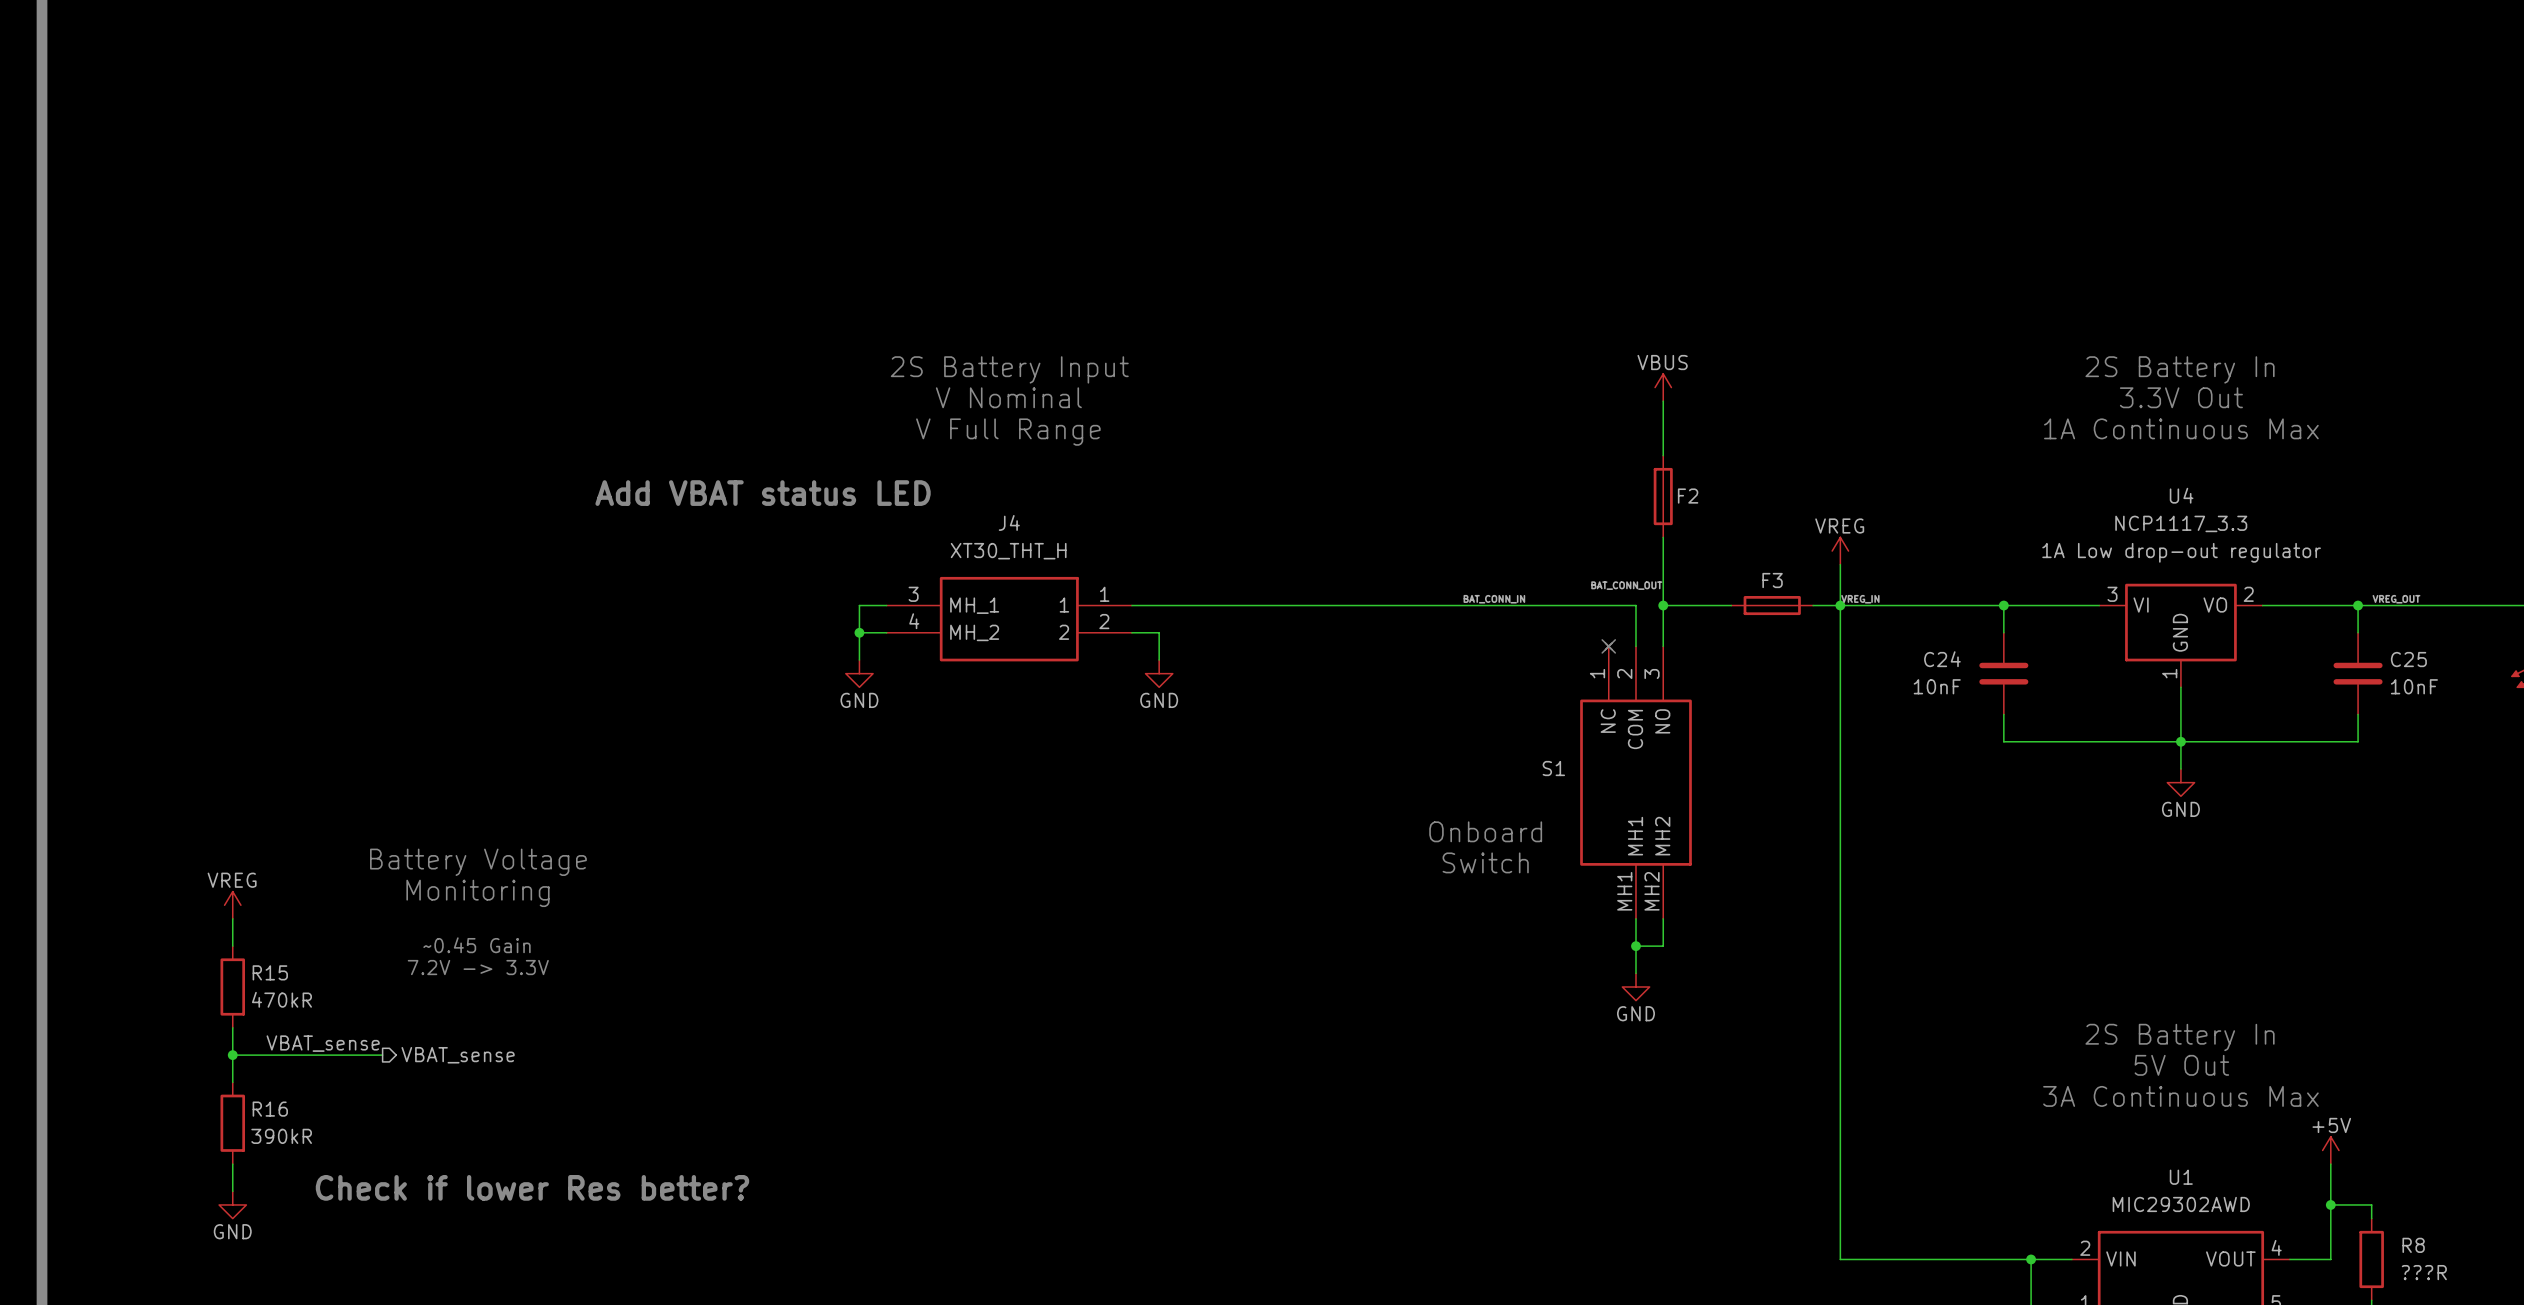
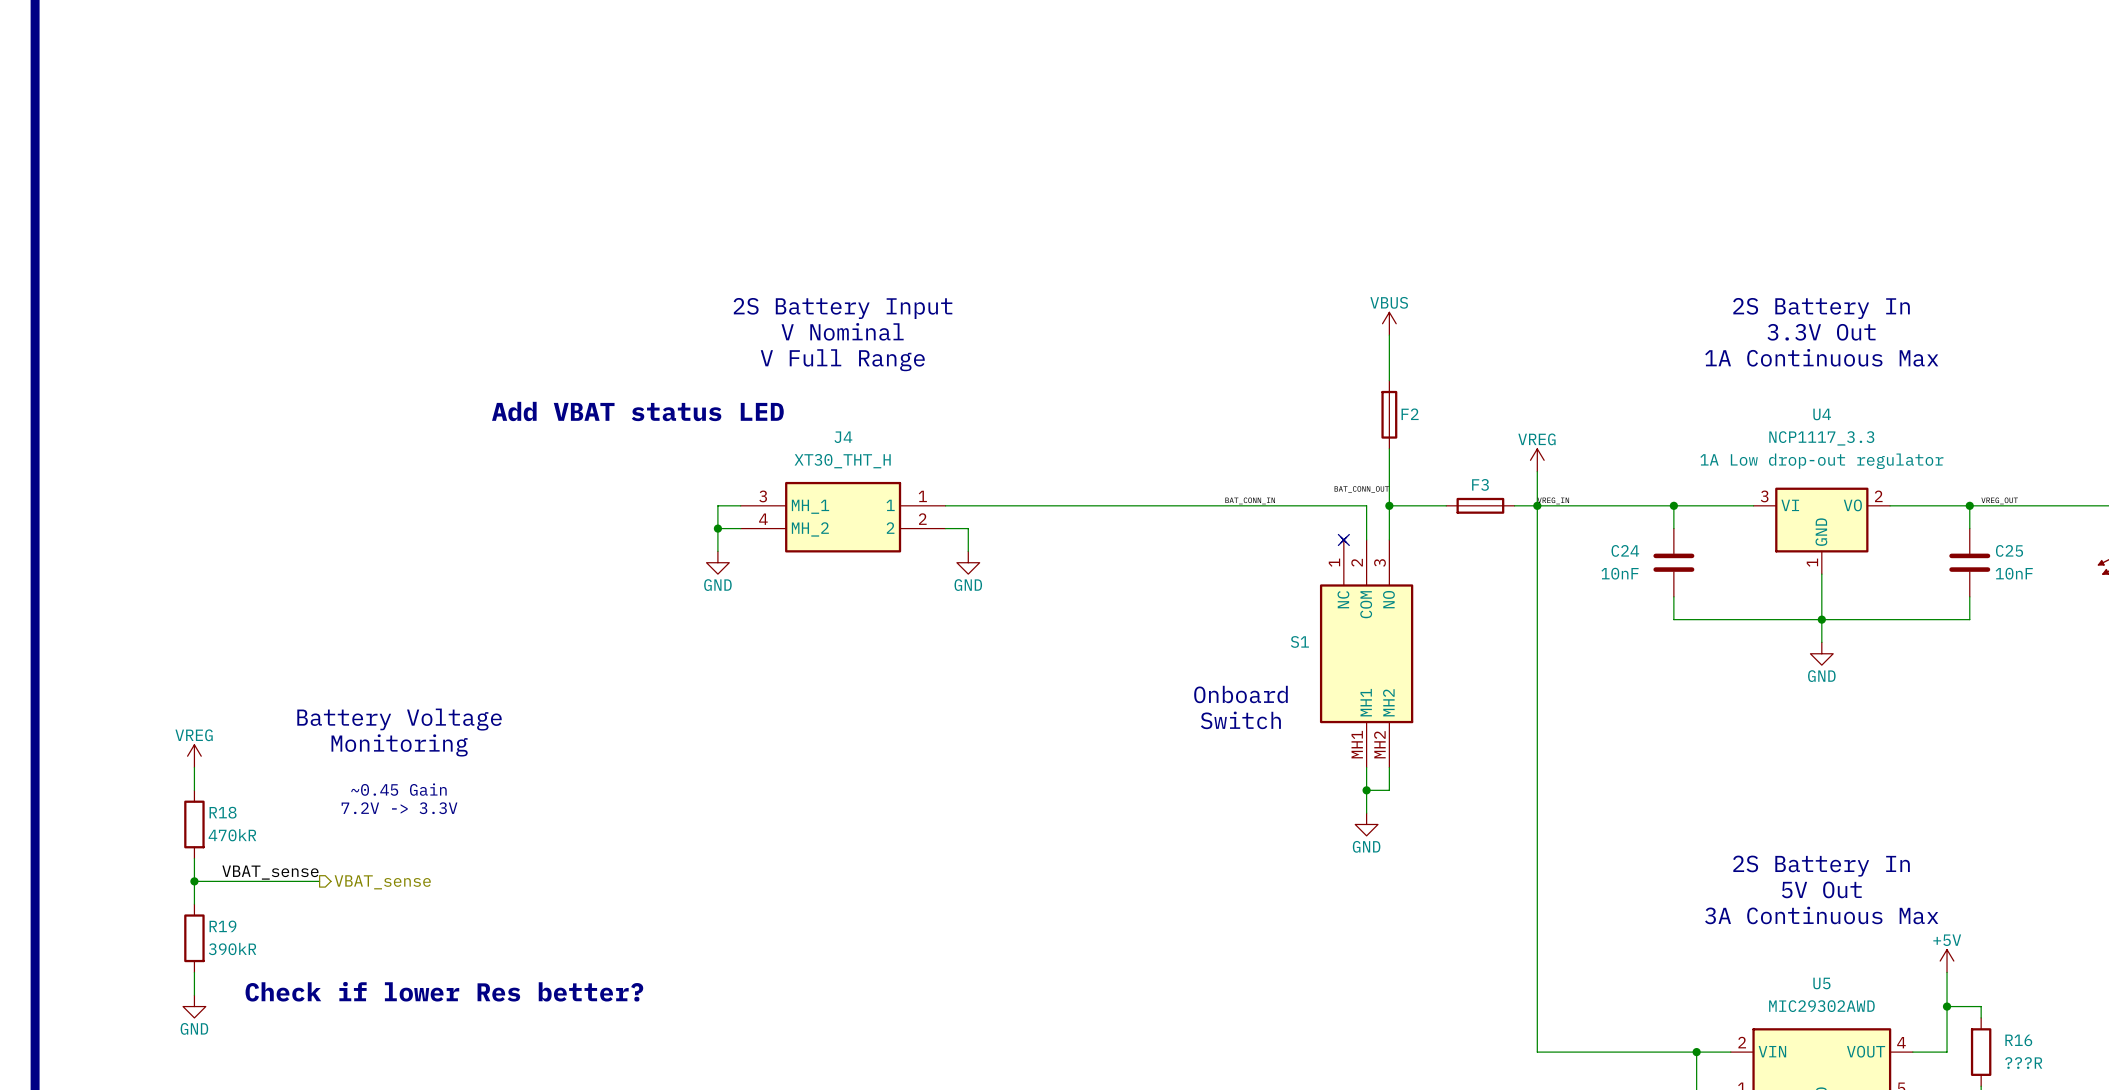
R15 name: R15 (270, 972) -> R18 (223, 812)
R16 name: R16 (270, 1109) -> R19 (222, 926)
U1 name: U1 (2181, 1177) -> U5 (1821, 983)
R8 name: R8 (2413, 1245) -> R16 (2018, 1040)

